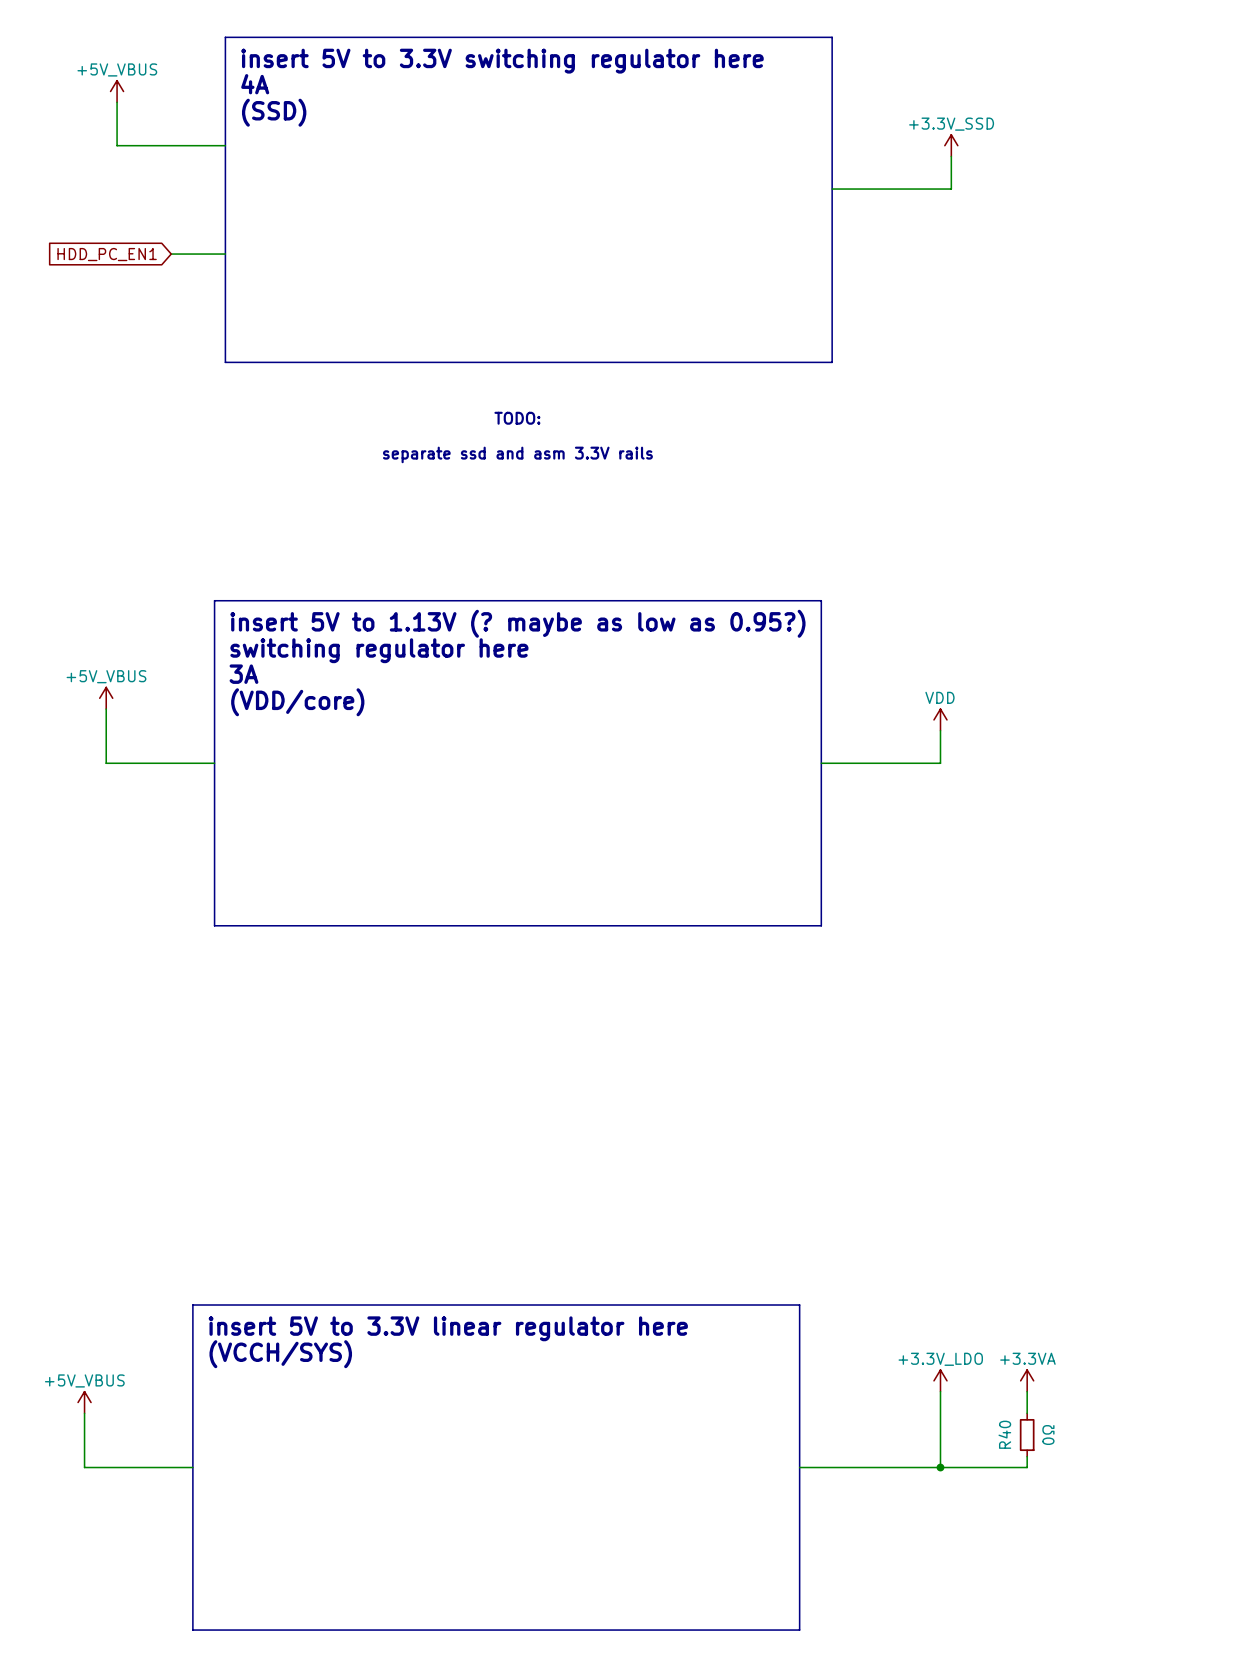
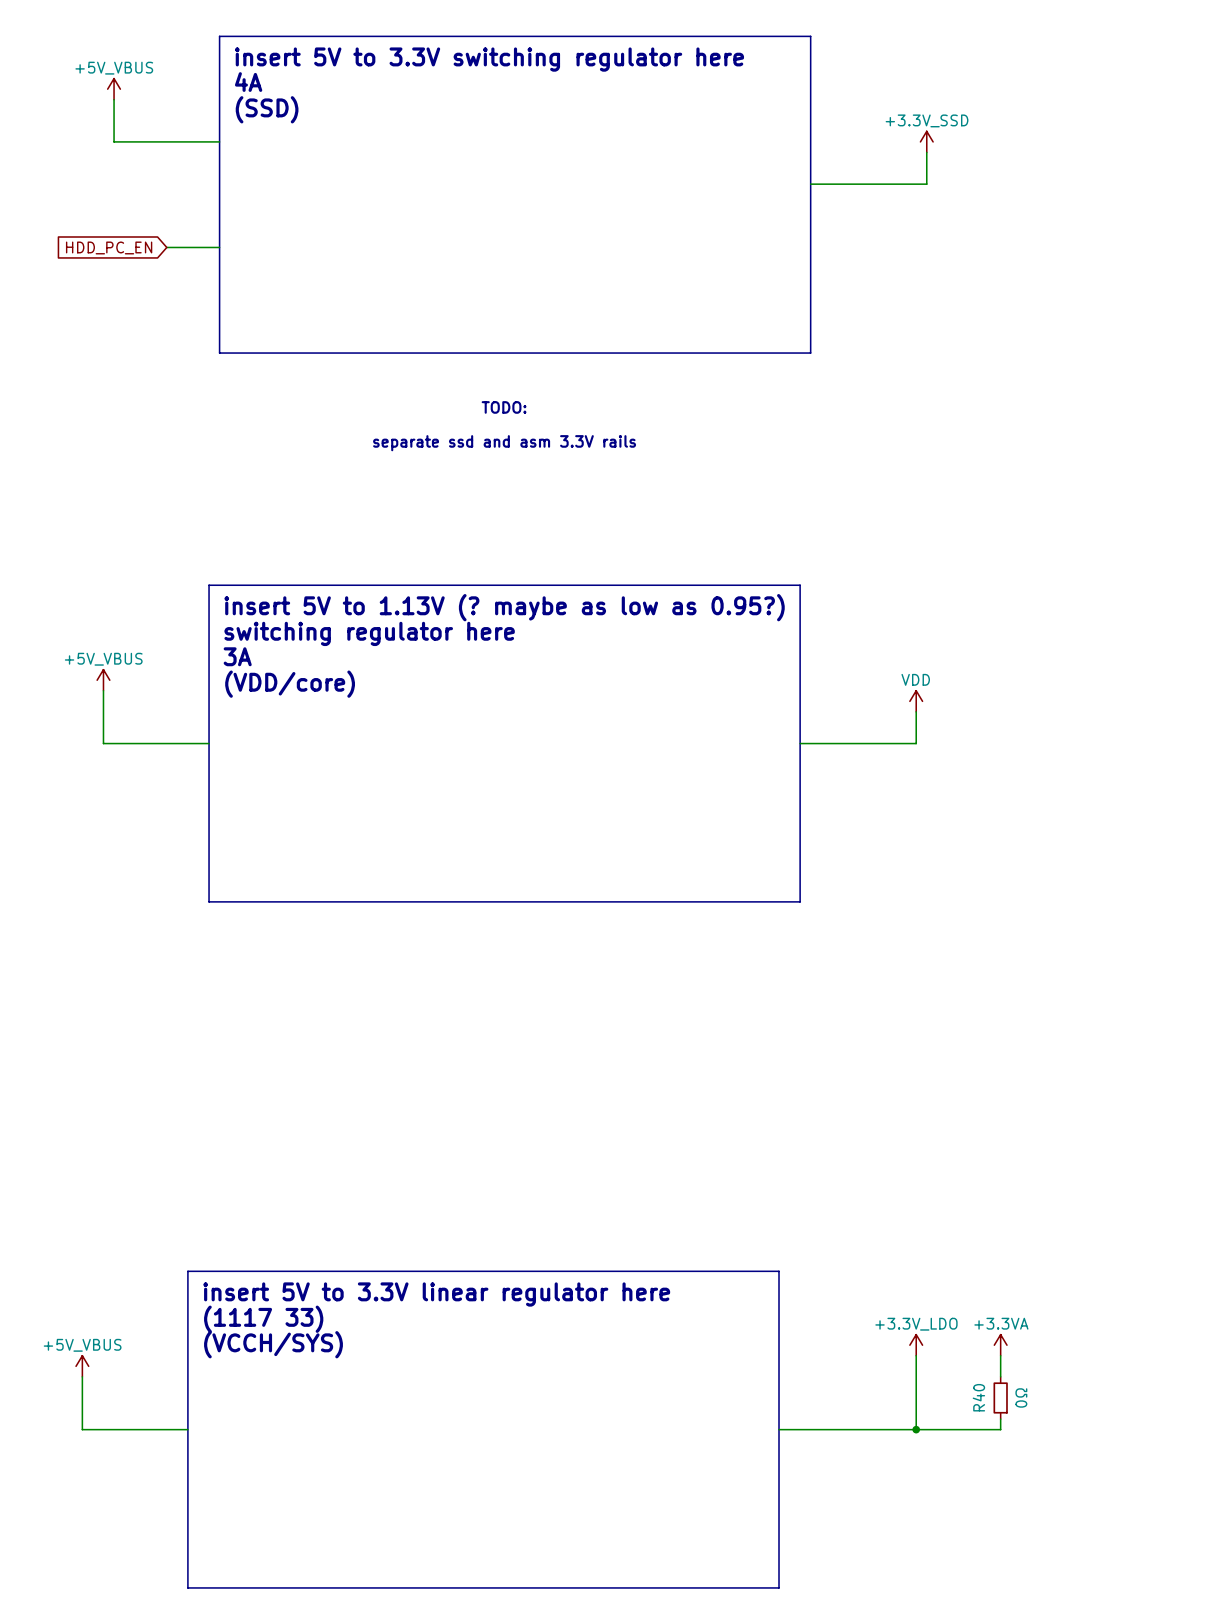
global label: HDD_PC_EN1 (107, 254) -> HDD_PC_EN (109, 247)
text: (VCCH/SYS) (280, 1354) -> (1117 33) (263, 1319)
text: none -> (VCCH/SYS) (273, 1344)

